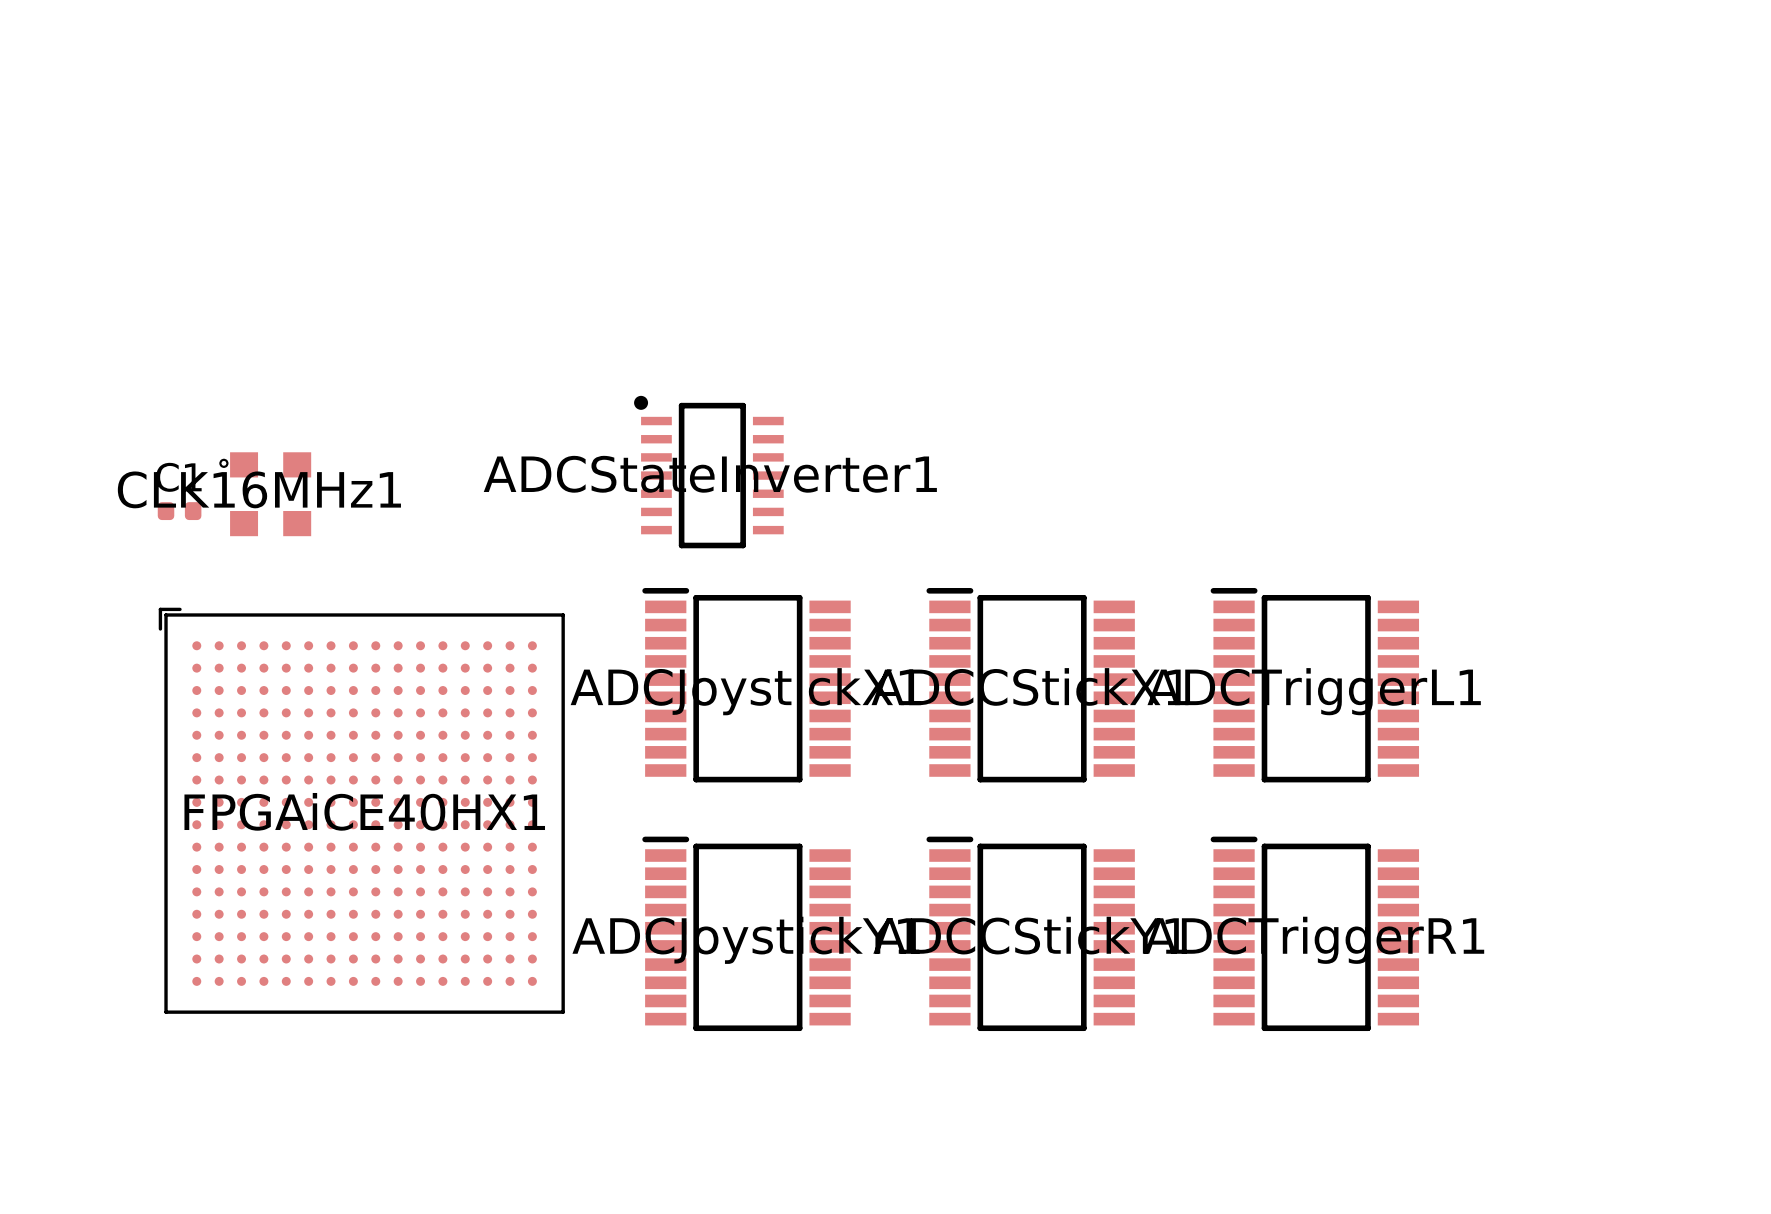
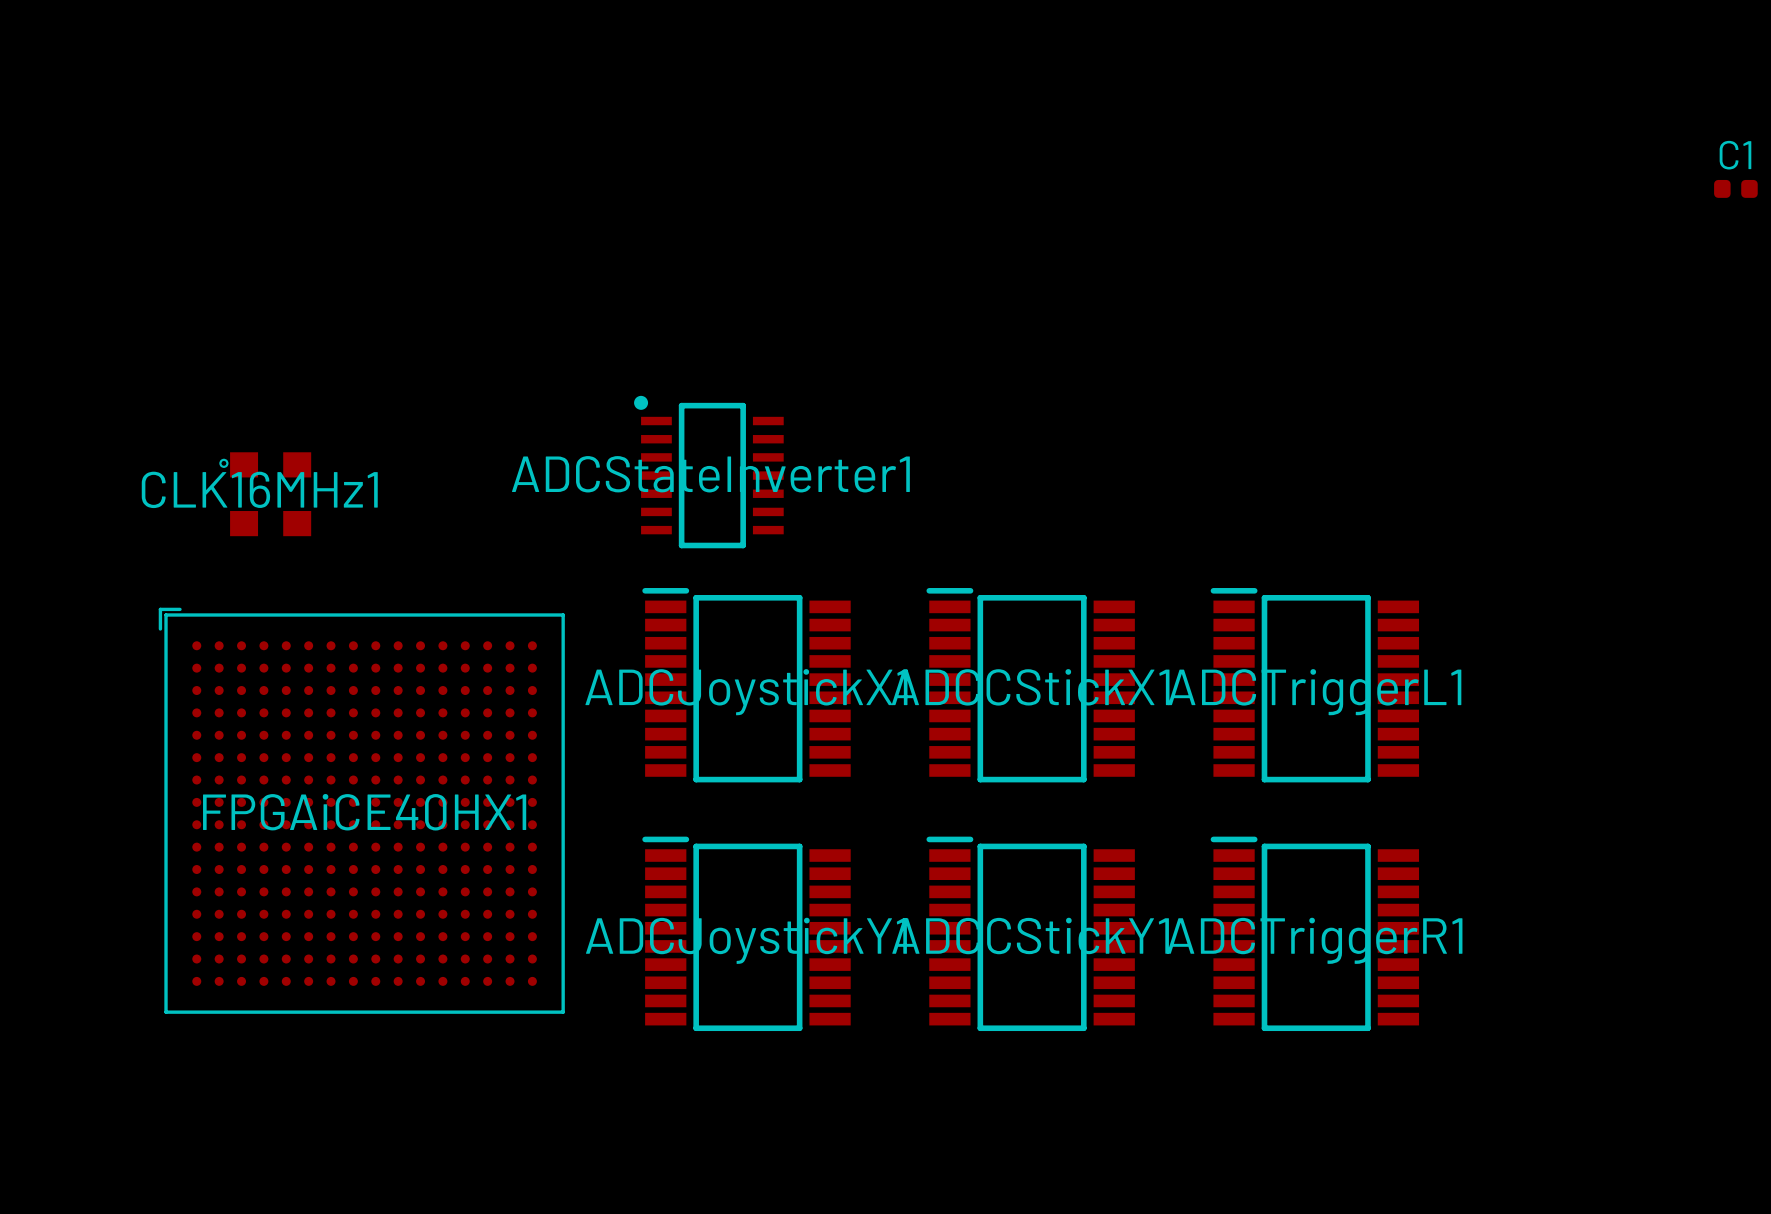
C1 position: (179, 511) -> (1735, 188)

